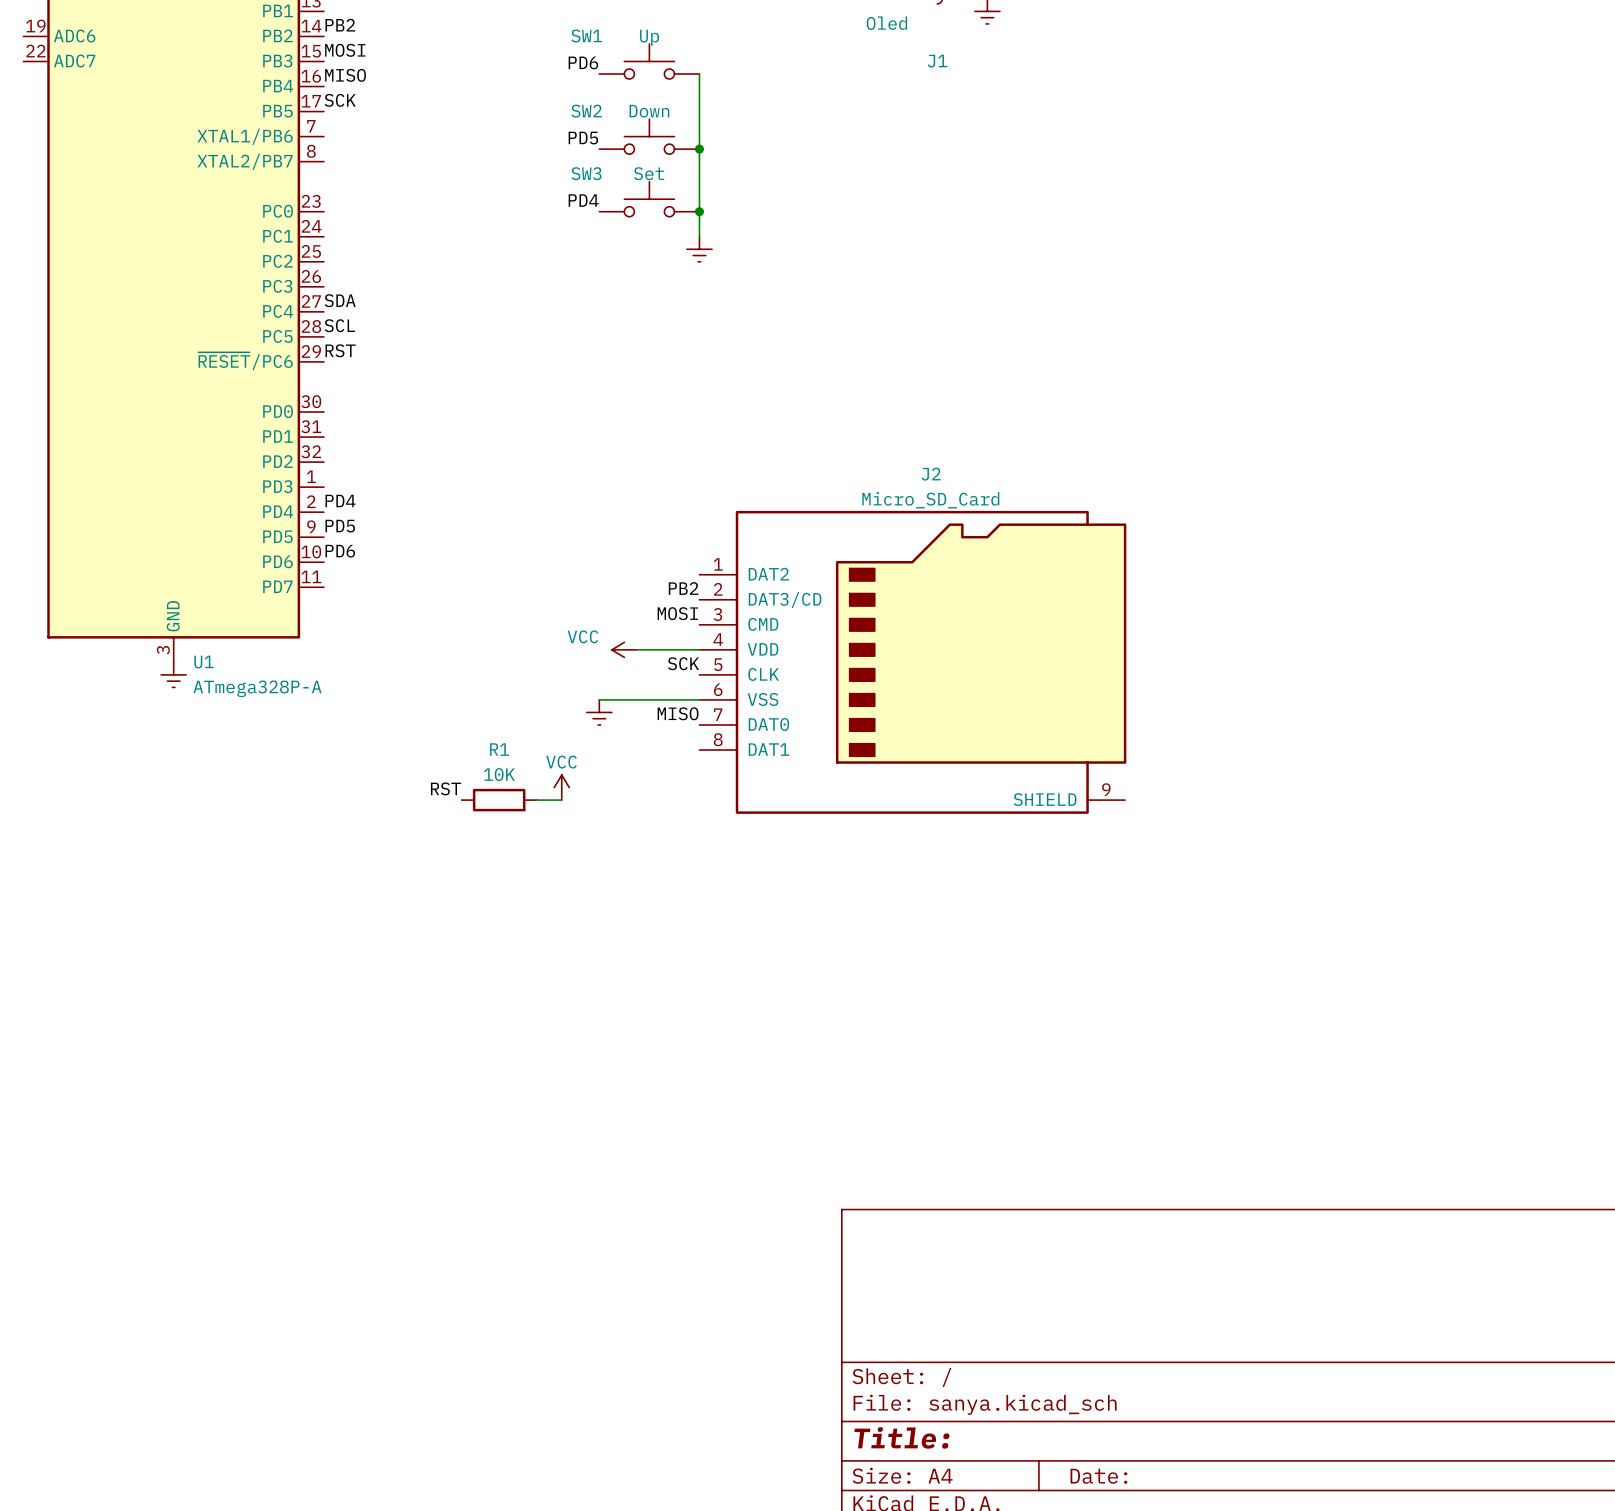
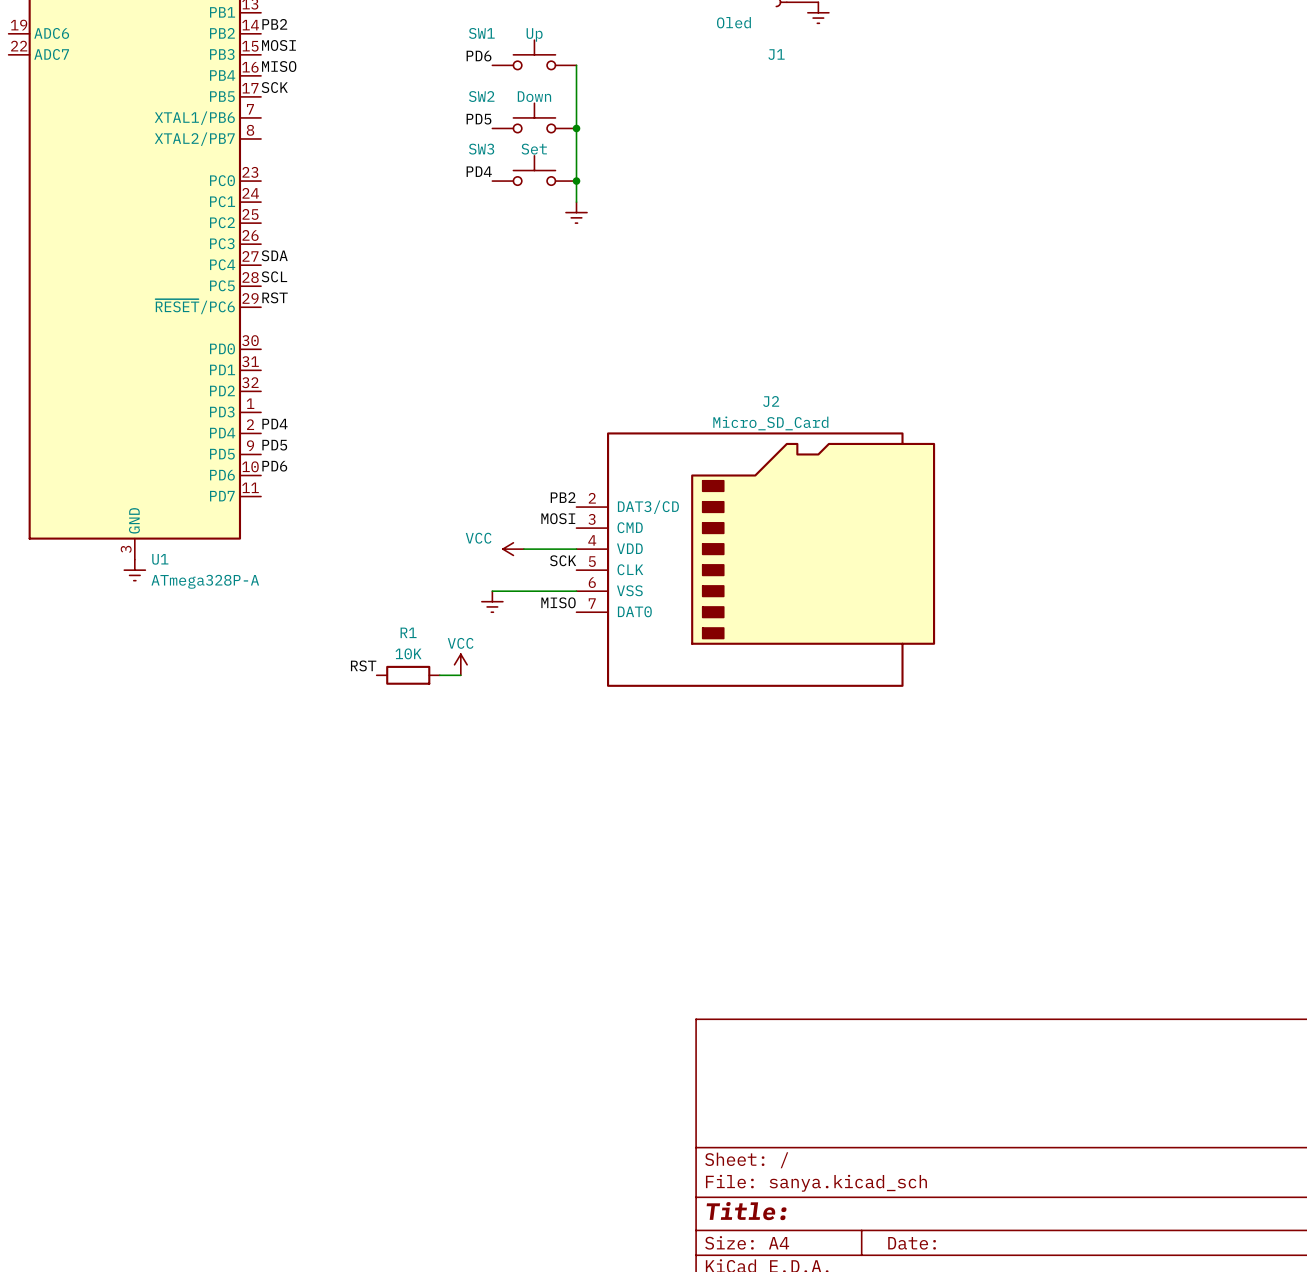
J2 symbol: [699, 510, 1127, 814] -> [576, 432, 936, 687]

